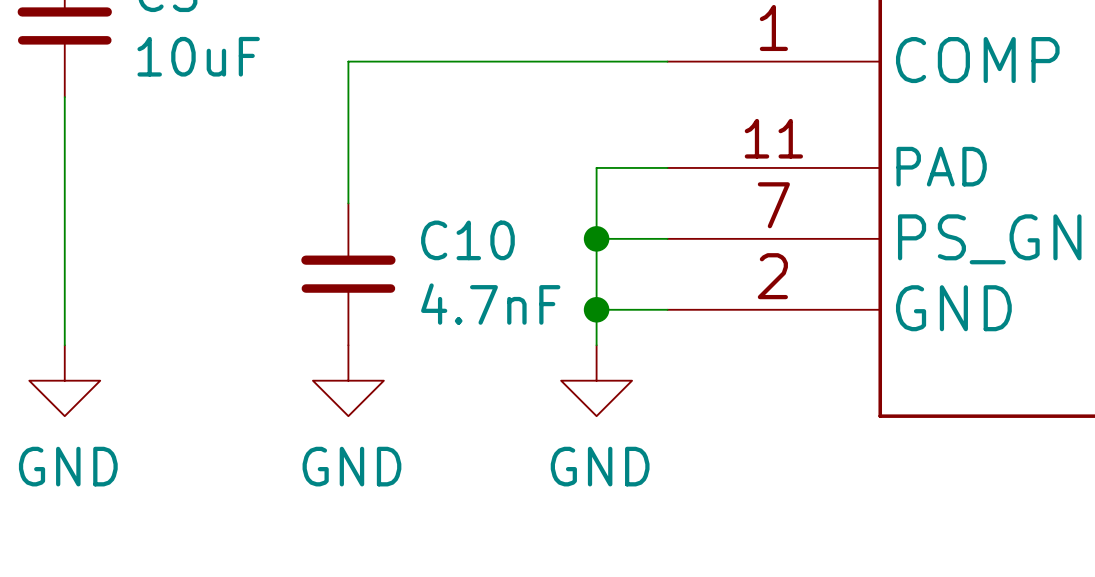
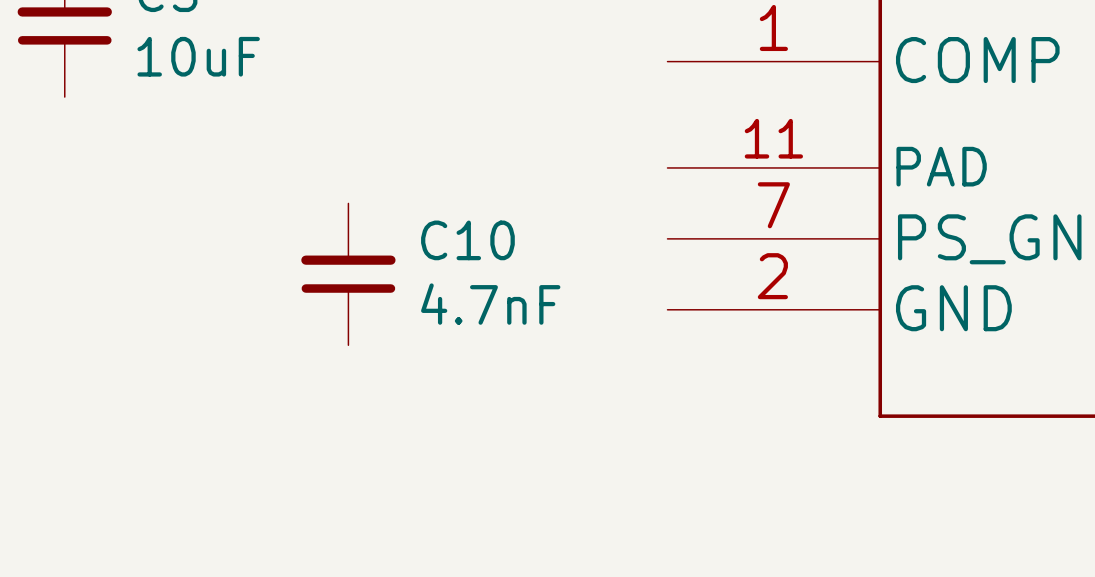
wire: (667, 61) (348, 61) (348, 203) -> none
wire: (64, 97) (64, 345) -> none
wire: (667, 167) (596, 167) (596, 345) -> none
wire: (596, 238) (667, 238) -> none
junction: (596, 238) -> none
wire: (596, 309) (667, 309) -> none
junction: (596, 309) -> none
power symbol: GND (64, 380) -> none
power symbol: GND (348, 380) -> none
power symbol: GND (596, 380) -> none

